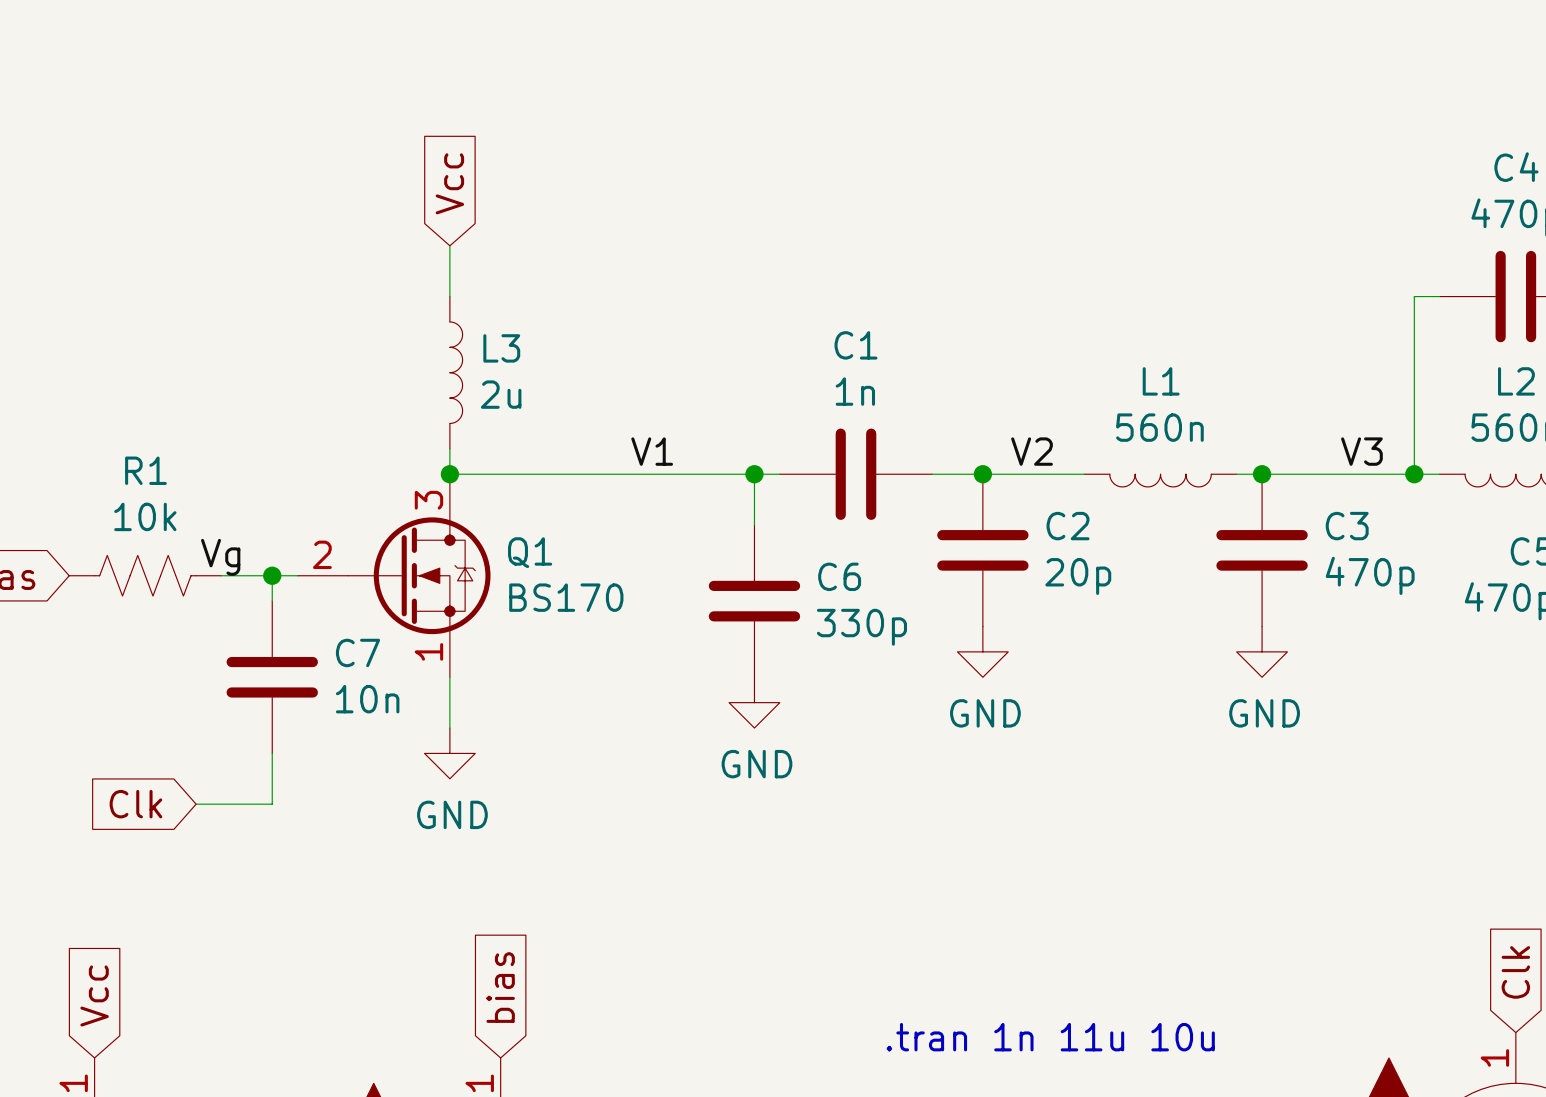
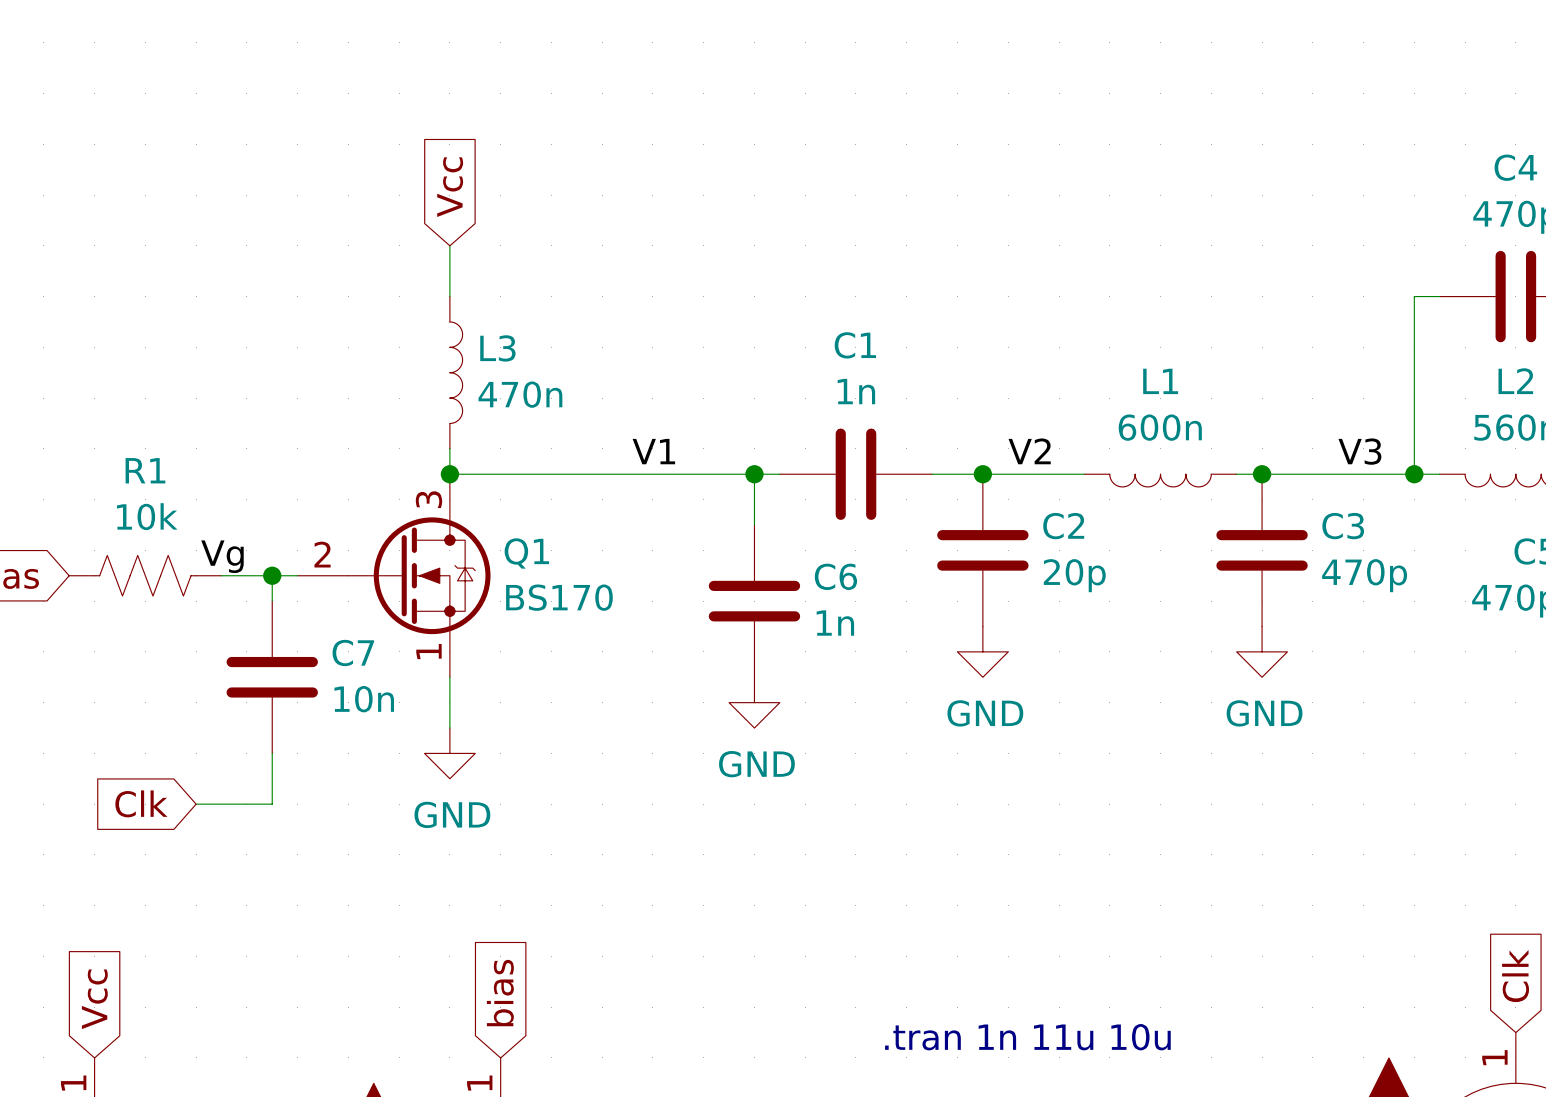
L3 value: 2u (501, 394) -> 470n (520, 394)
L1 value: 560n (1159, 427) -> 600n (1160, 427)
C6 value: 330p (861, 627) -> 1n (835, 623)

